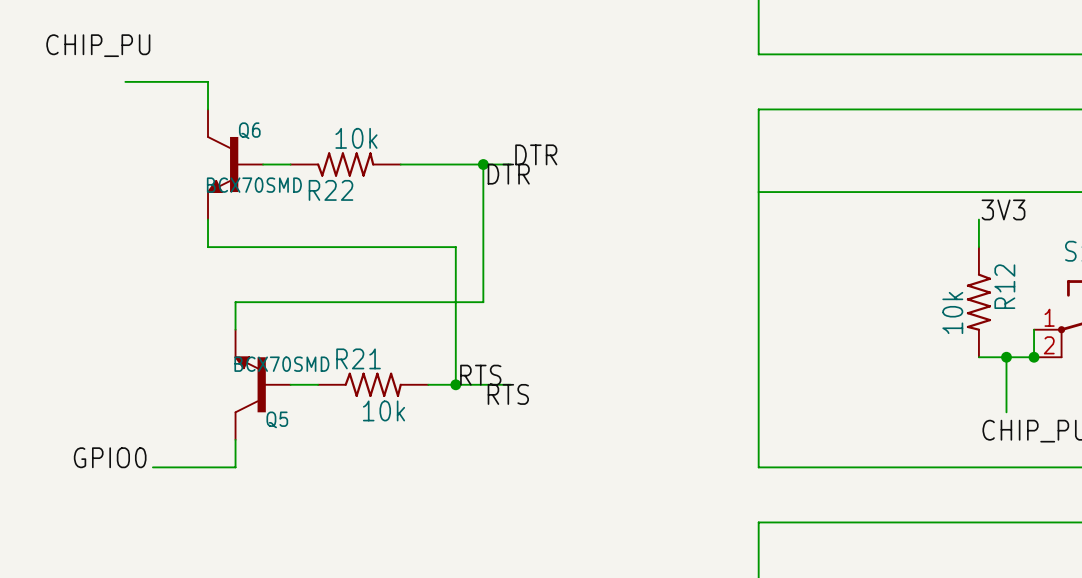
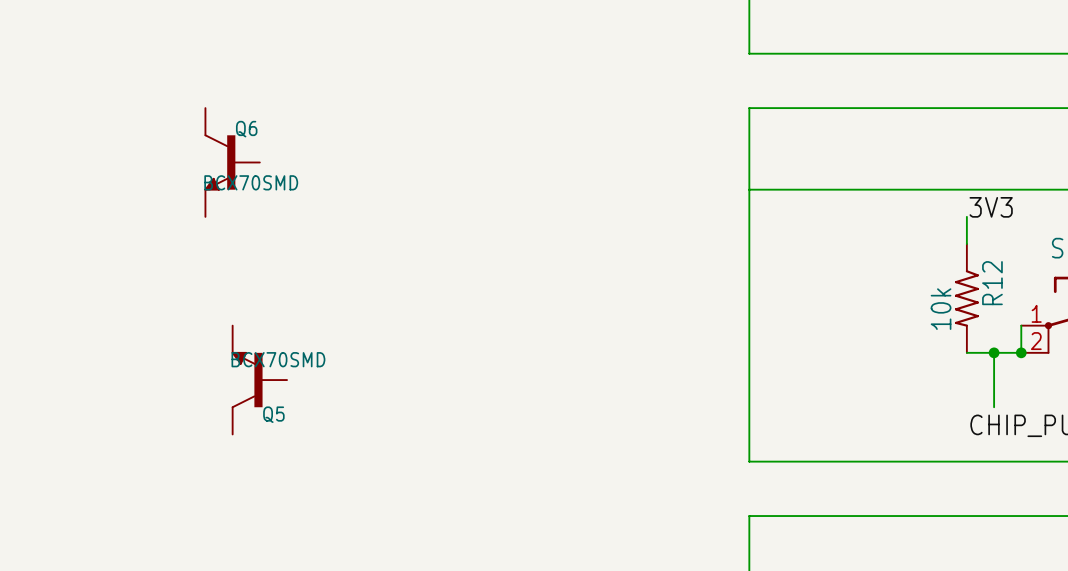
label: CHIP_PU (98, 45) -> none
wire: (125, 81) (208, 81) (208, 109) -> none
label: DTR (536, 154) -> none
wire: (263, 164) (290, 164) -> none
R22: 10k (345, 164) -> none
wire: (400, 164) (510, 164) -> none
wire: (483, 164) (483, 302) (235, 302) (235, 329) -> none
junction: (483, 164) -> none
label: DTR (508, 174) -> none
wire: (208, 219) (208, 247) (455, 247) (455, 384) -> none
label: RTS (480, 375) -> none
wire: (290, 384) (318, 384) -> none
R21: 10k (373, 384) -> none
wire: (428, 384) (510, 384) -> none
junction: (455, 384) -> none
label: RTS (508, 394) -> none
wire: (235, 439) (235, 467) (152, 467) -> none
label: GPIO0 (110, 457) -> none

